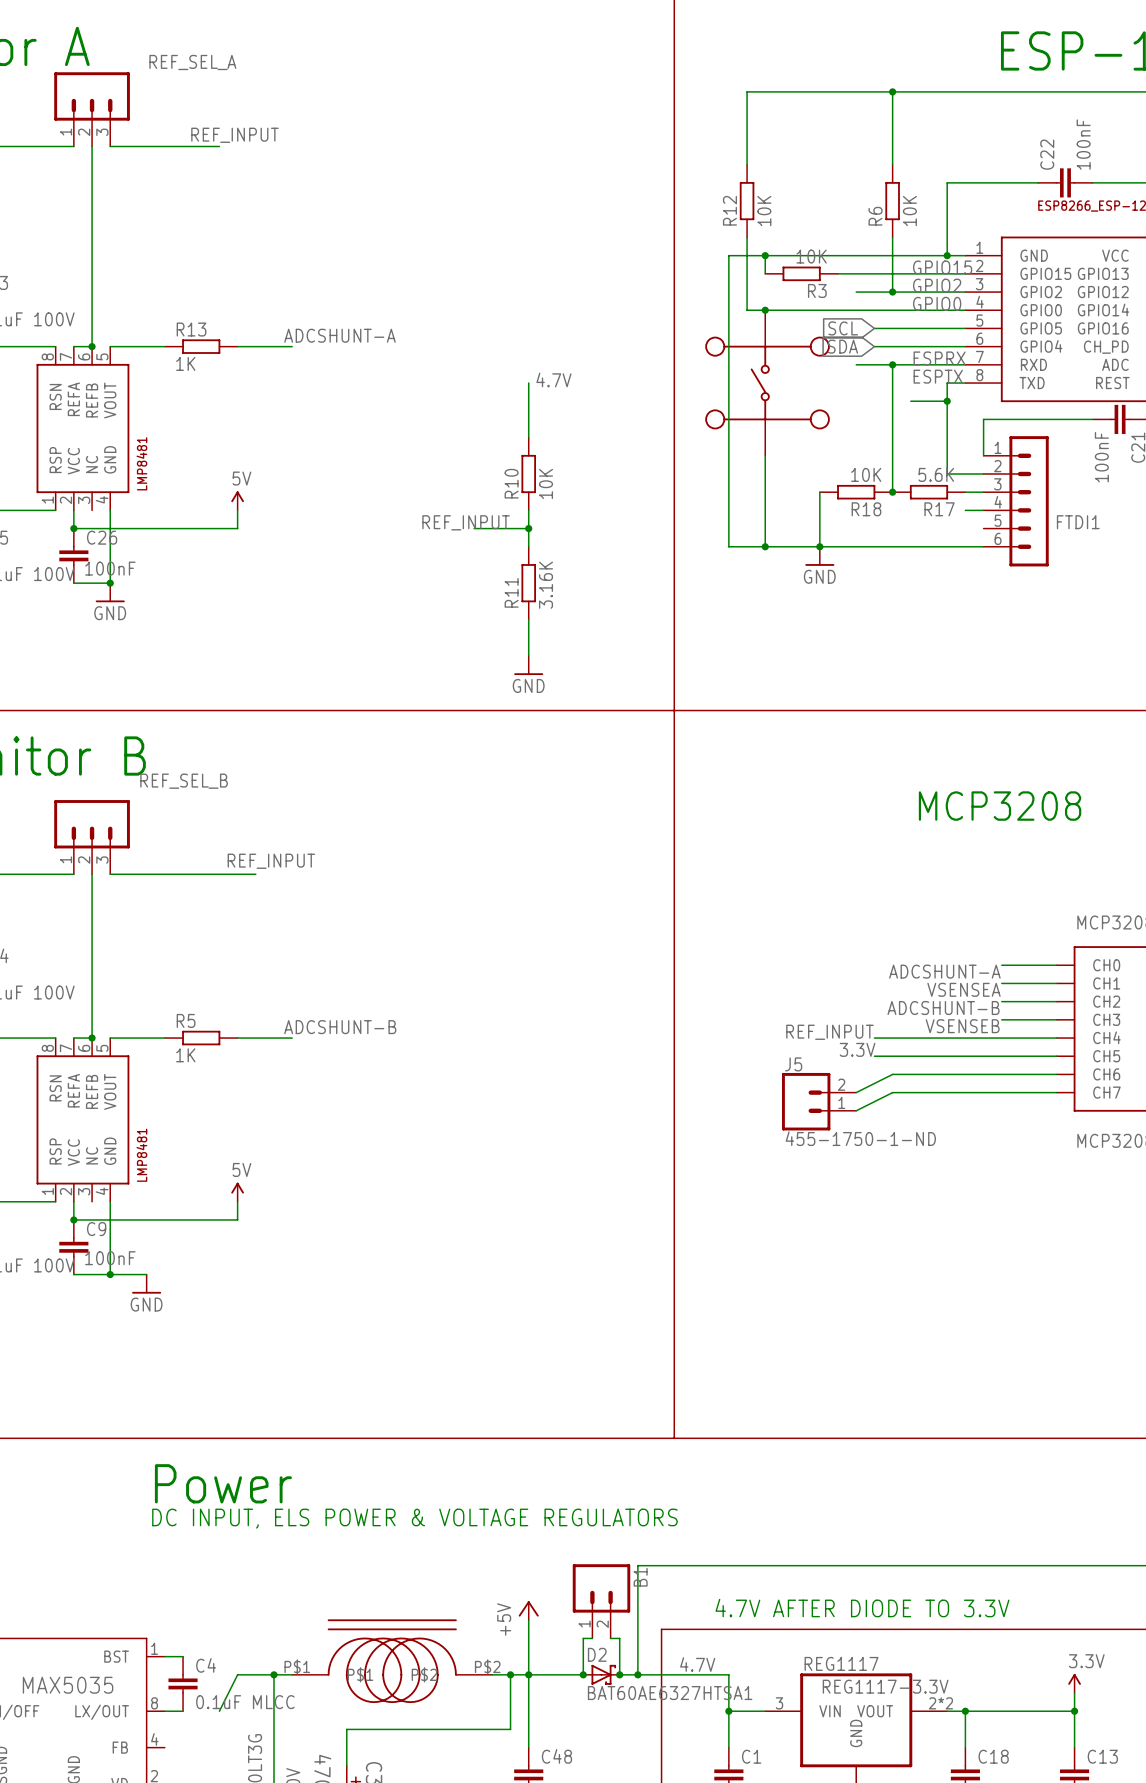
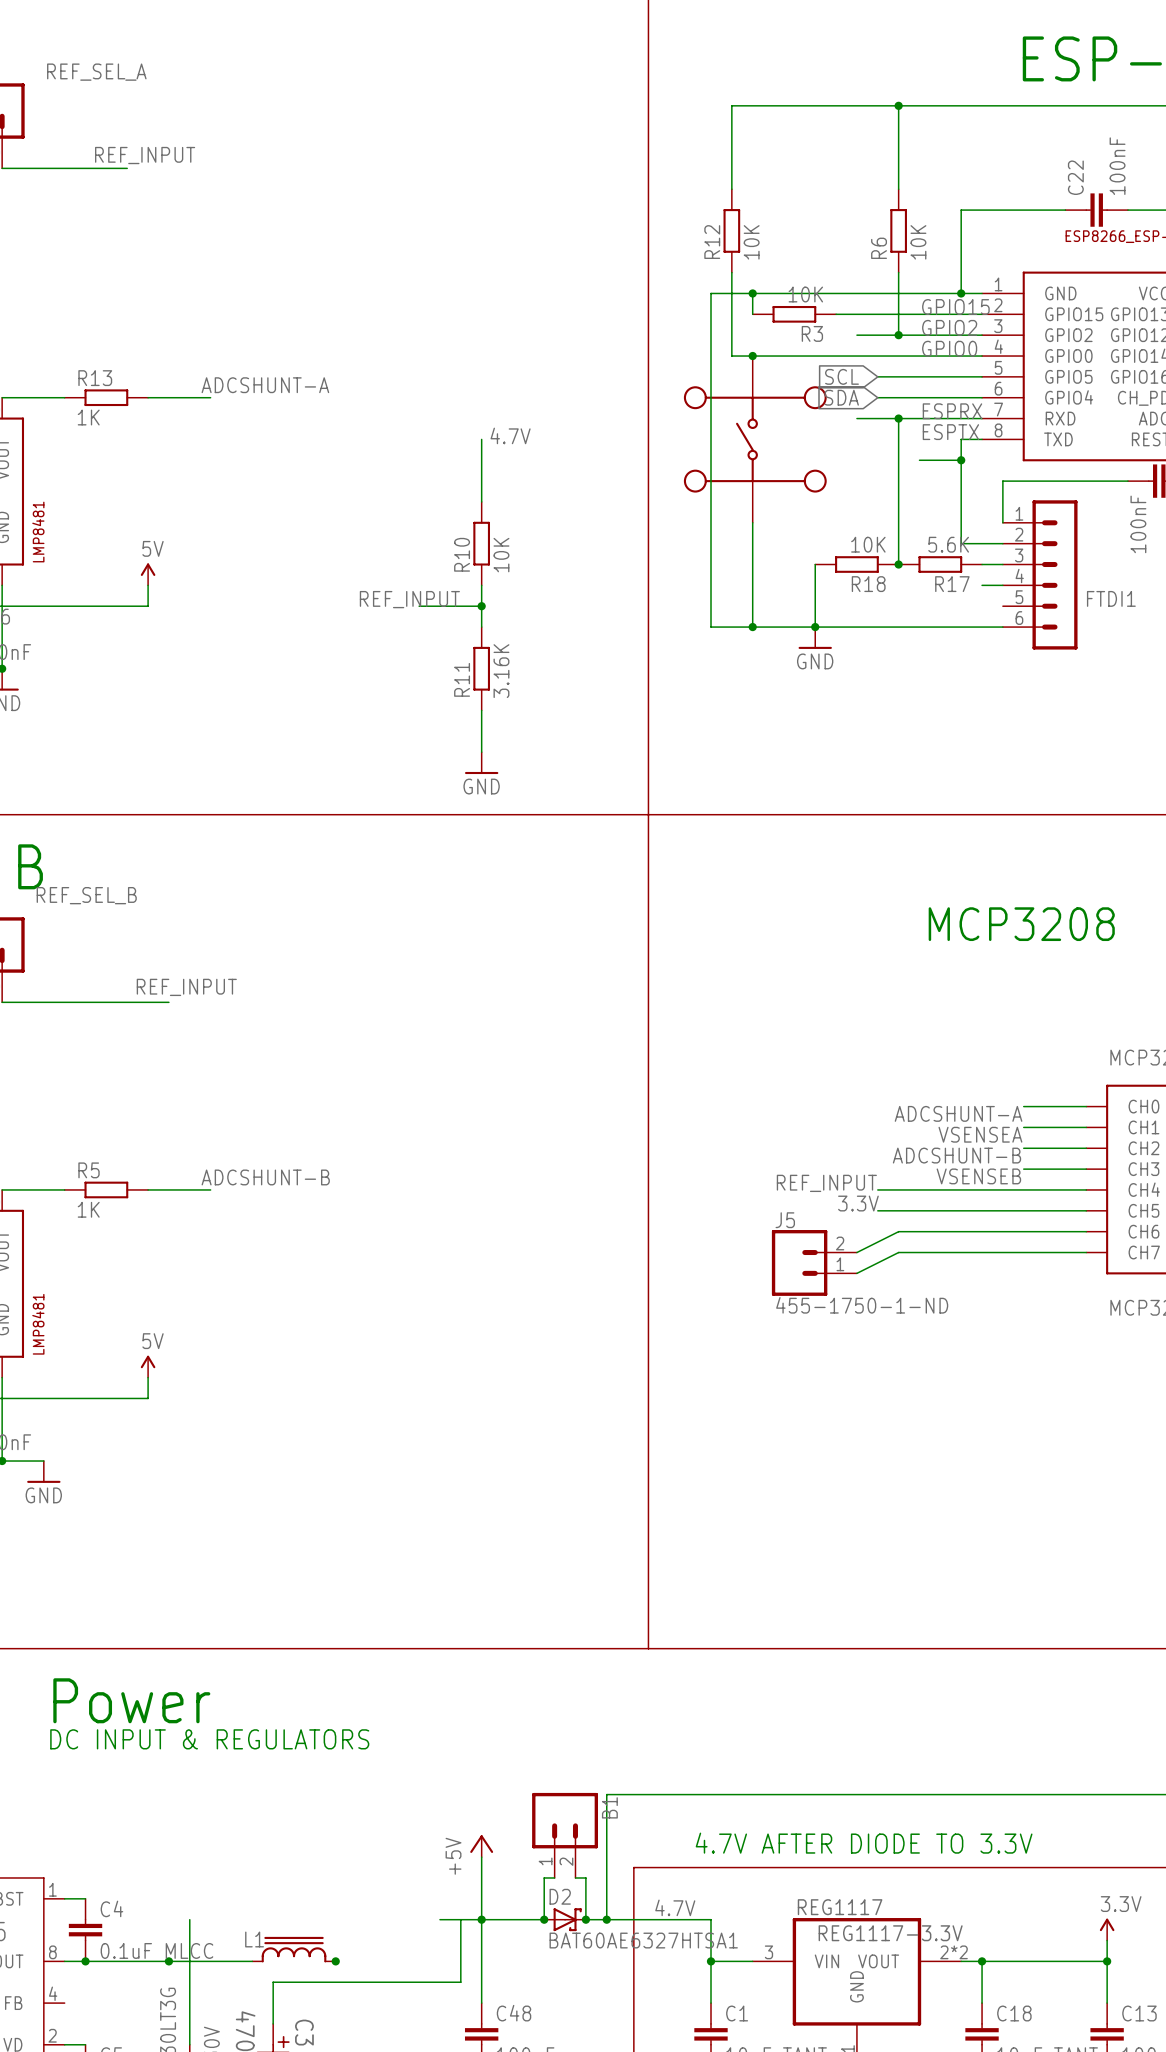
text: DC INPUT, ELS POWER & VOLTAGE REGULATORS (414, 1518) -> DC INPUT & REGULATORS (209, 1739)
part: (392, 1661) -> none
junction position: (274, 1674) -> (168, 1961)
wire: (292, 1674) (237, 1674) (219, 1711) -> none
junction: (510, 1674) -> none
L1: none -> (294, 1949)
wire: none -> (85, 1961) (252, 1961)
junction: none -> (85, 1961)
junction: none -> (335, 1961)

